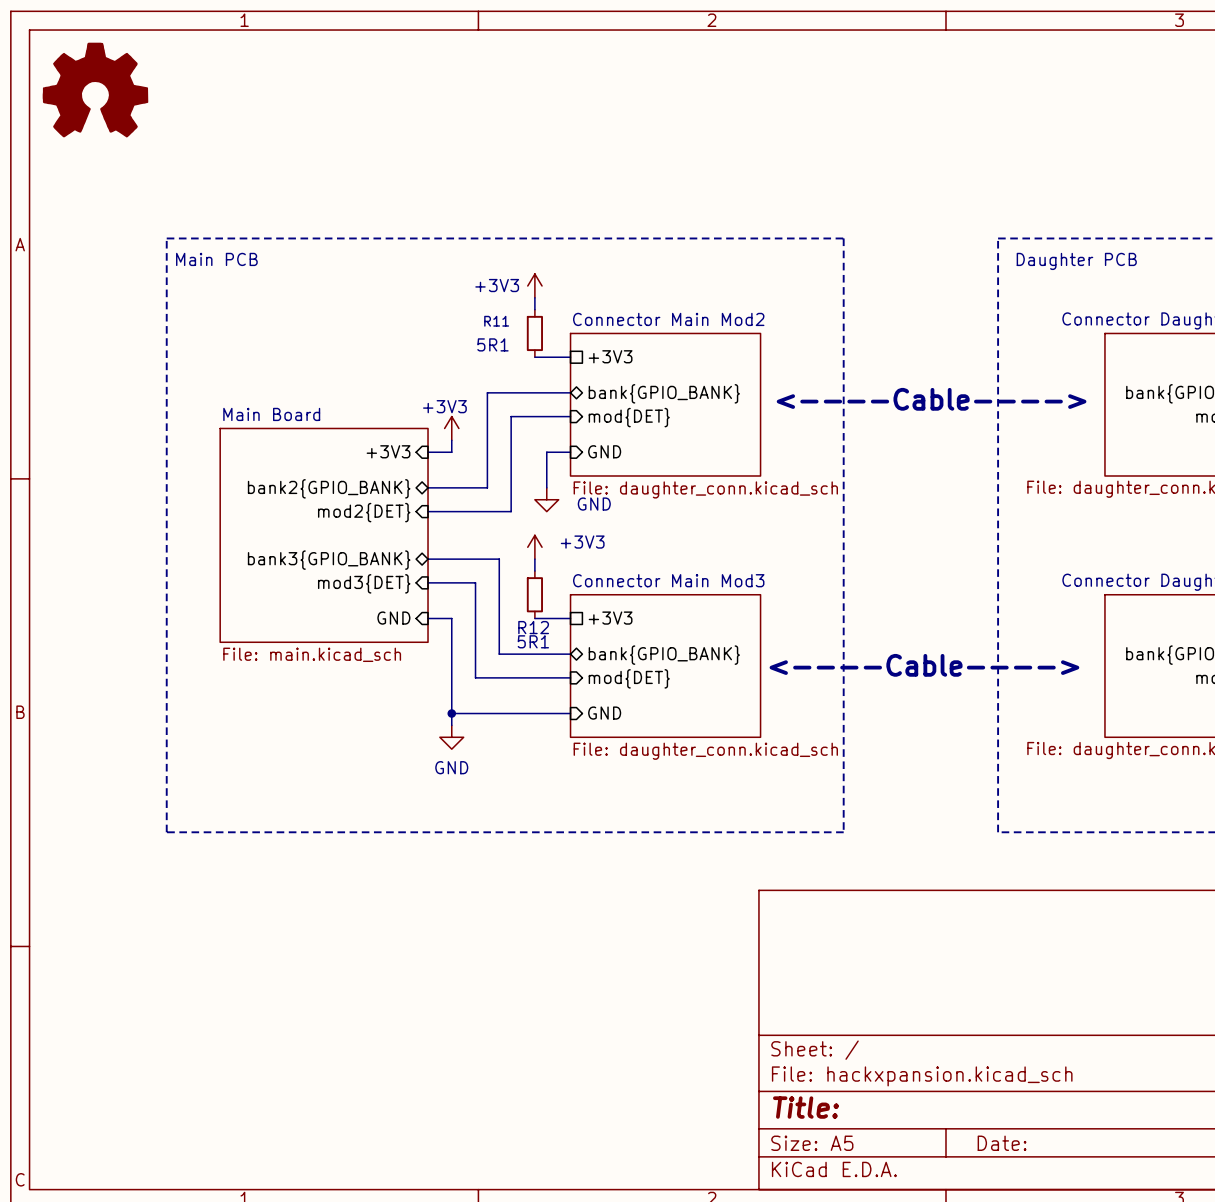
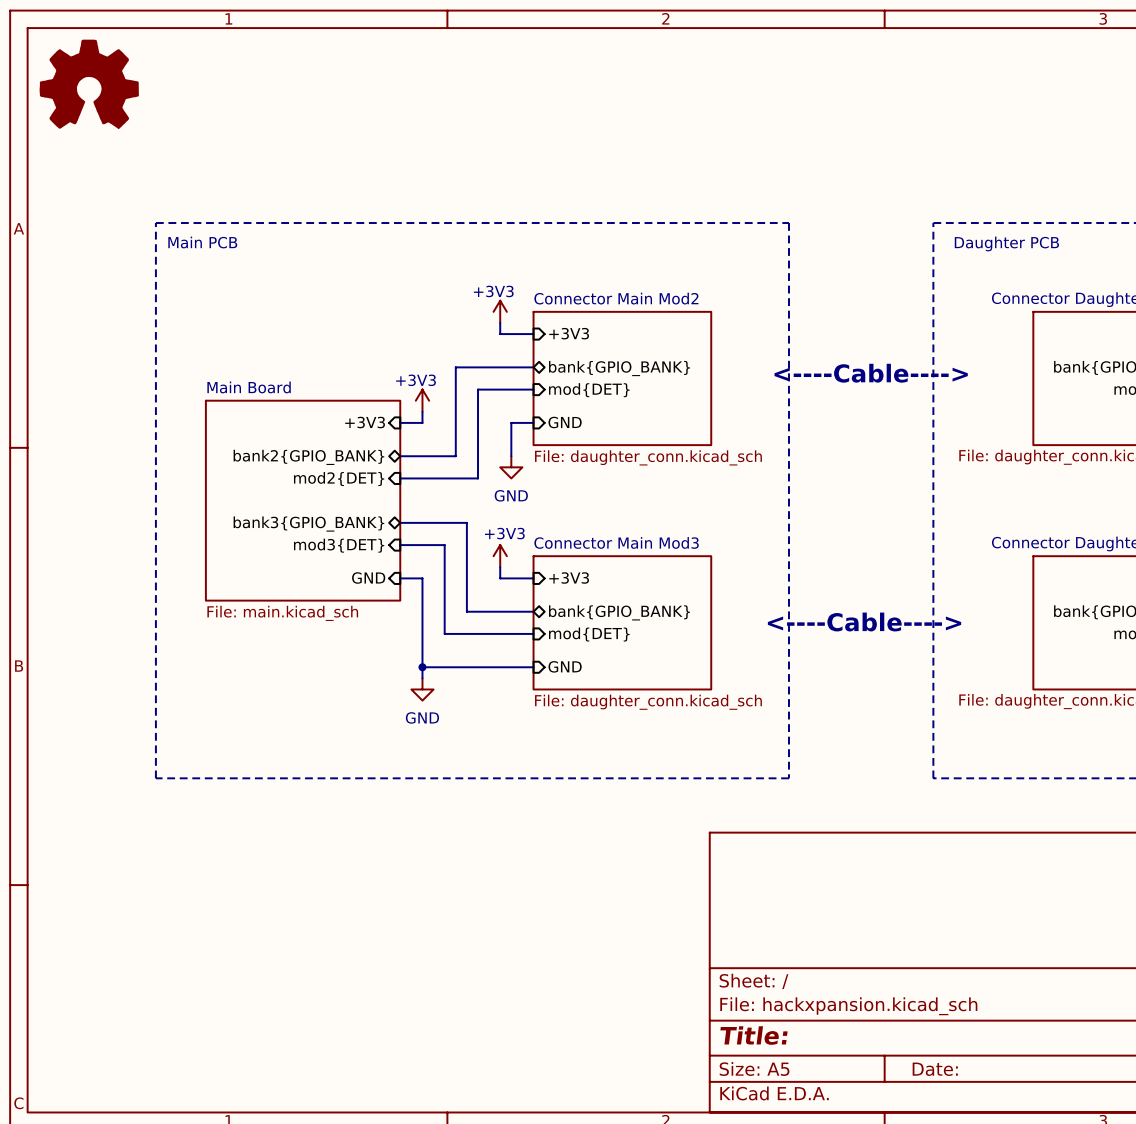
power symbol text position: +3V3 (497, 285) -> +3V3 (493, 291)
power symbol position: +3V3 (534, 285) -> +3V3 (500, 311)
R11: 5R1 (534, 333) -> none
sheet pin shape: passive (610, 356) -> input (569, 333)
power symbol text position: GND (594, 504) -> GND (511, 495)
power symbol text position: +3V3 (582, 542) -> +3V3 (504, 533)
power symbol position: +3V3 (534, 547) -> +3V3 (500, 556)
R12: 5R1 (534, 594) -> none
sheet pin shape: passive (610, 618) -> input (569, 578)

